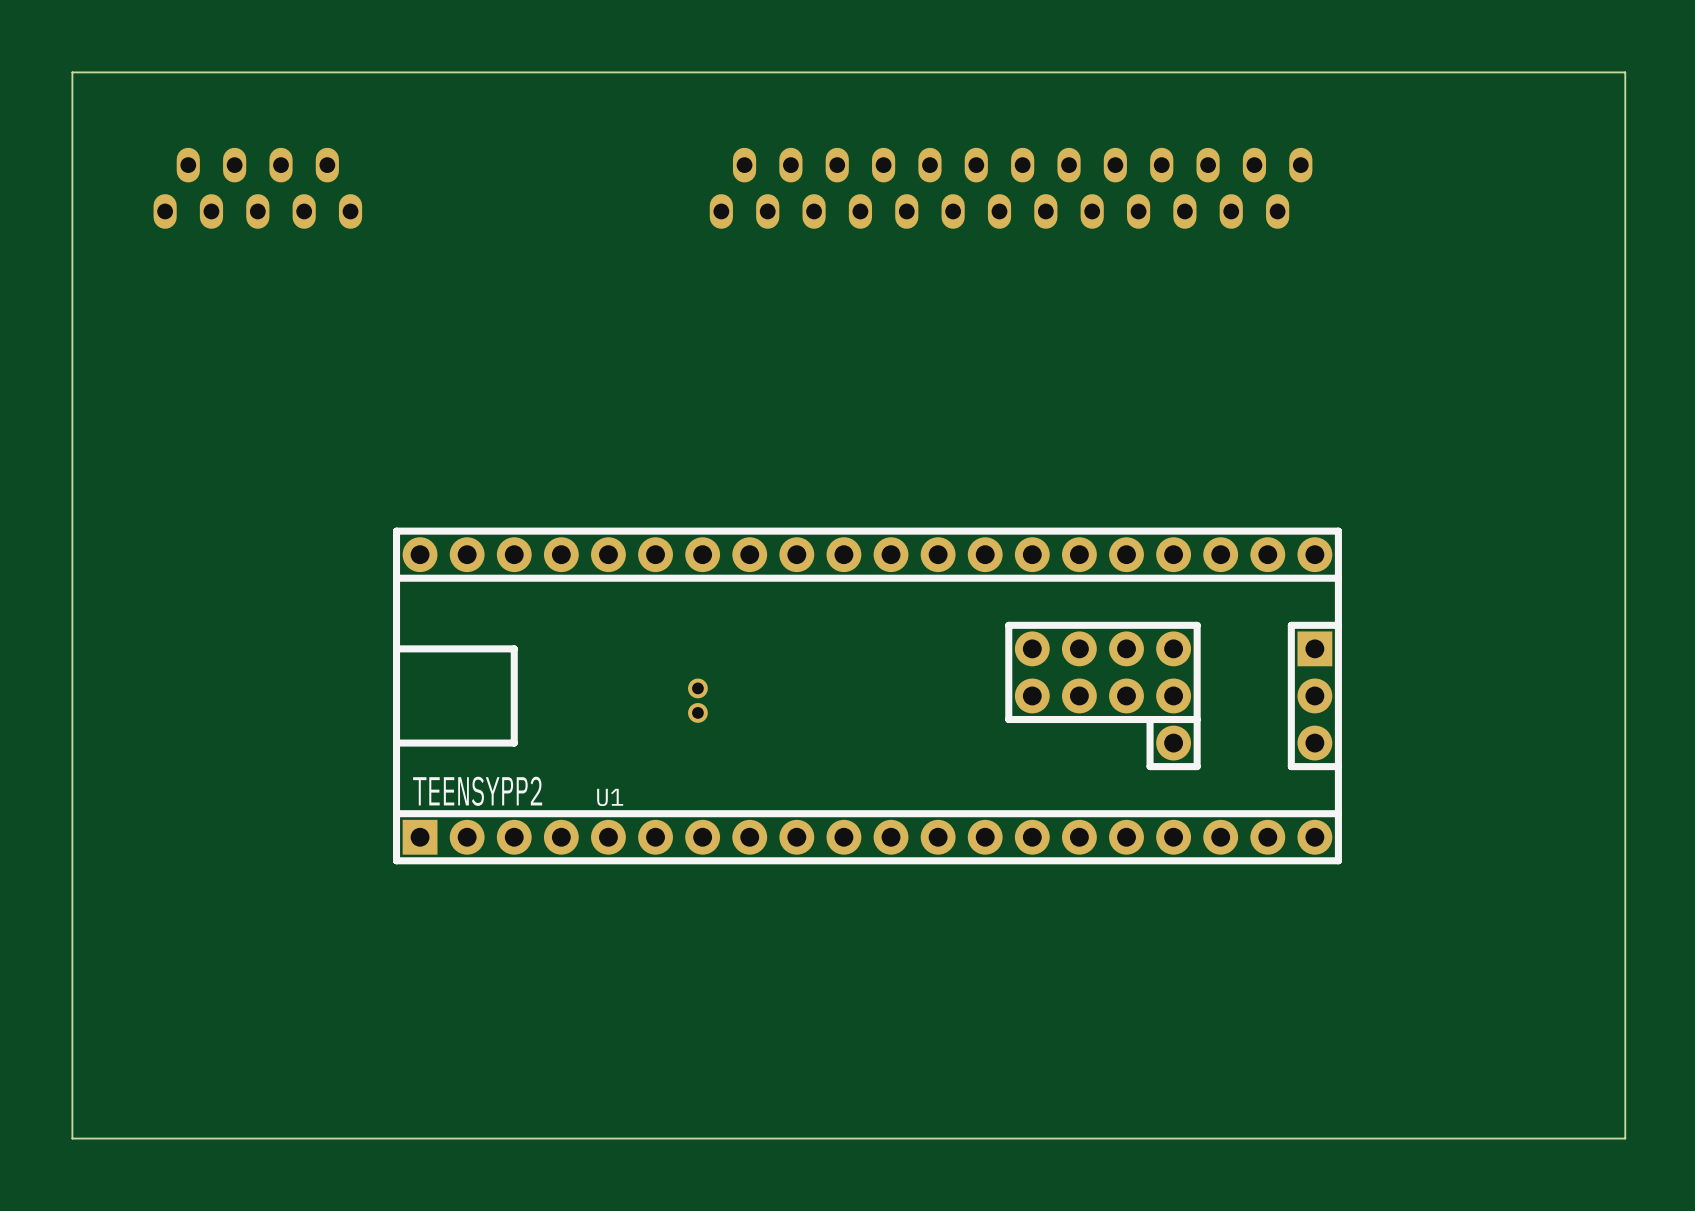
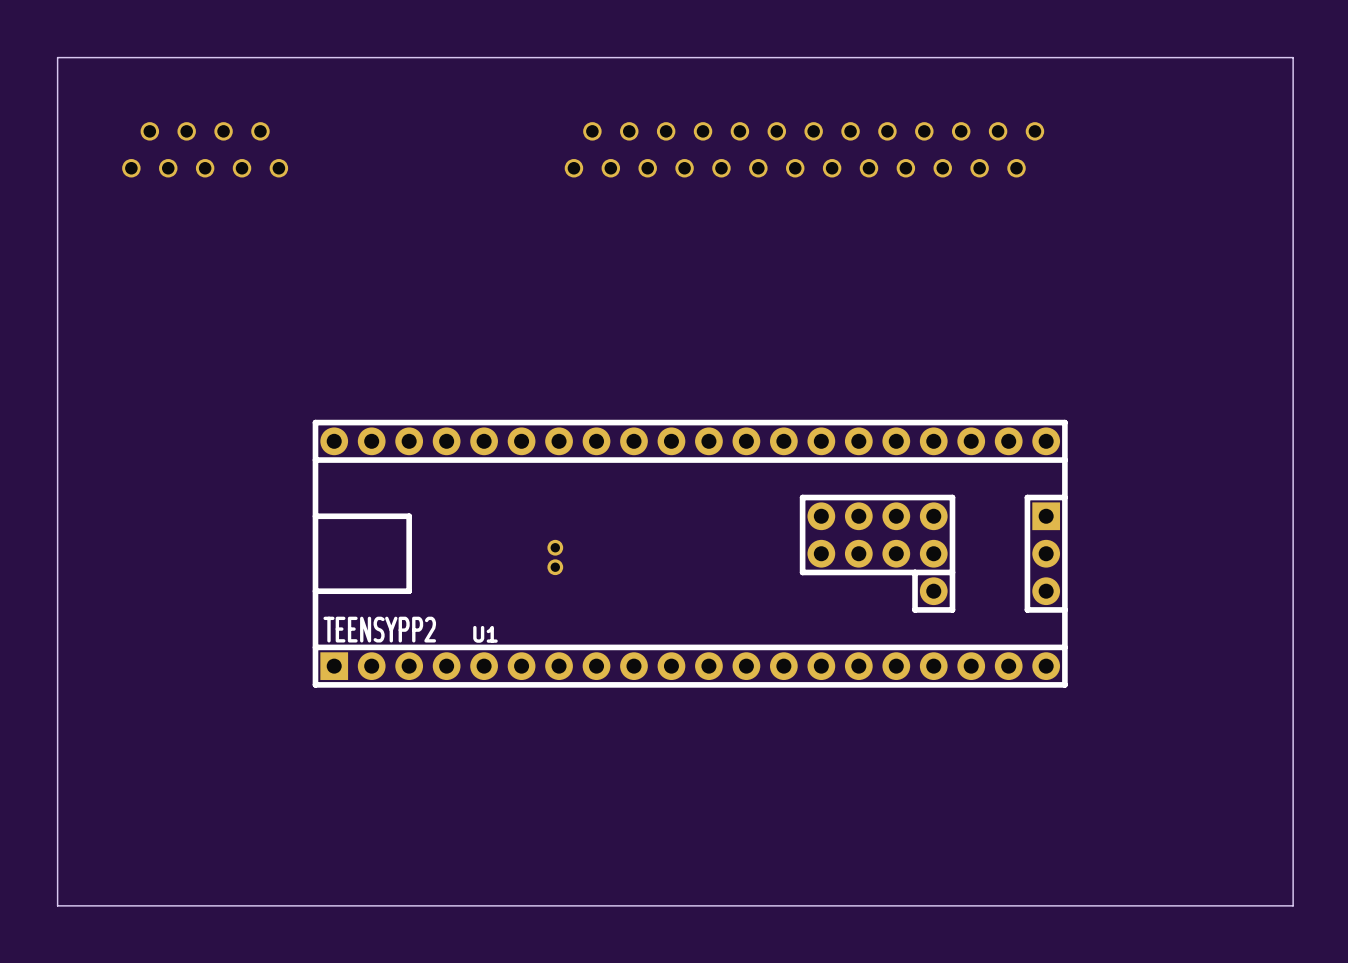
part footprint: [153, 147, 363, 229] -> [122, 122, 289, 178]
part footprint: [709, 147, 1313, 229] -> [564, 122, 1045, 178]

